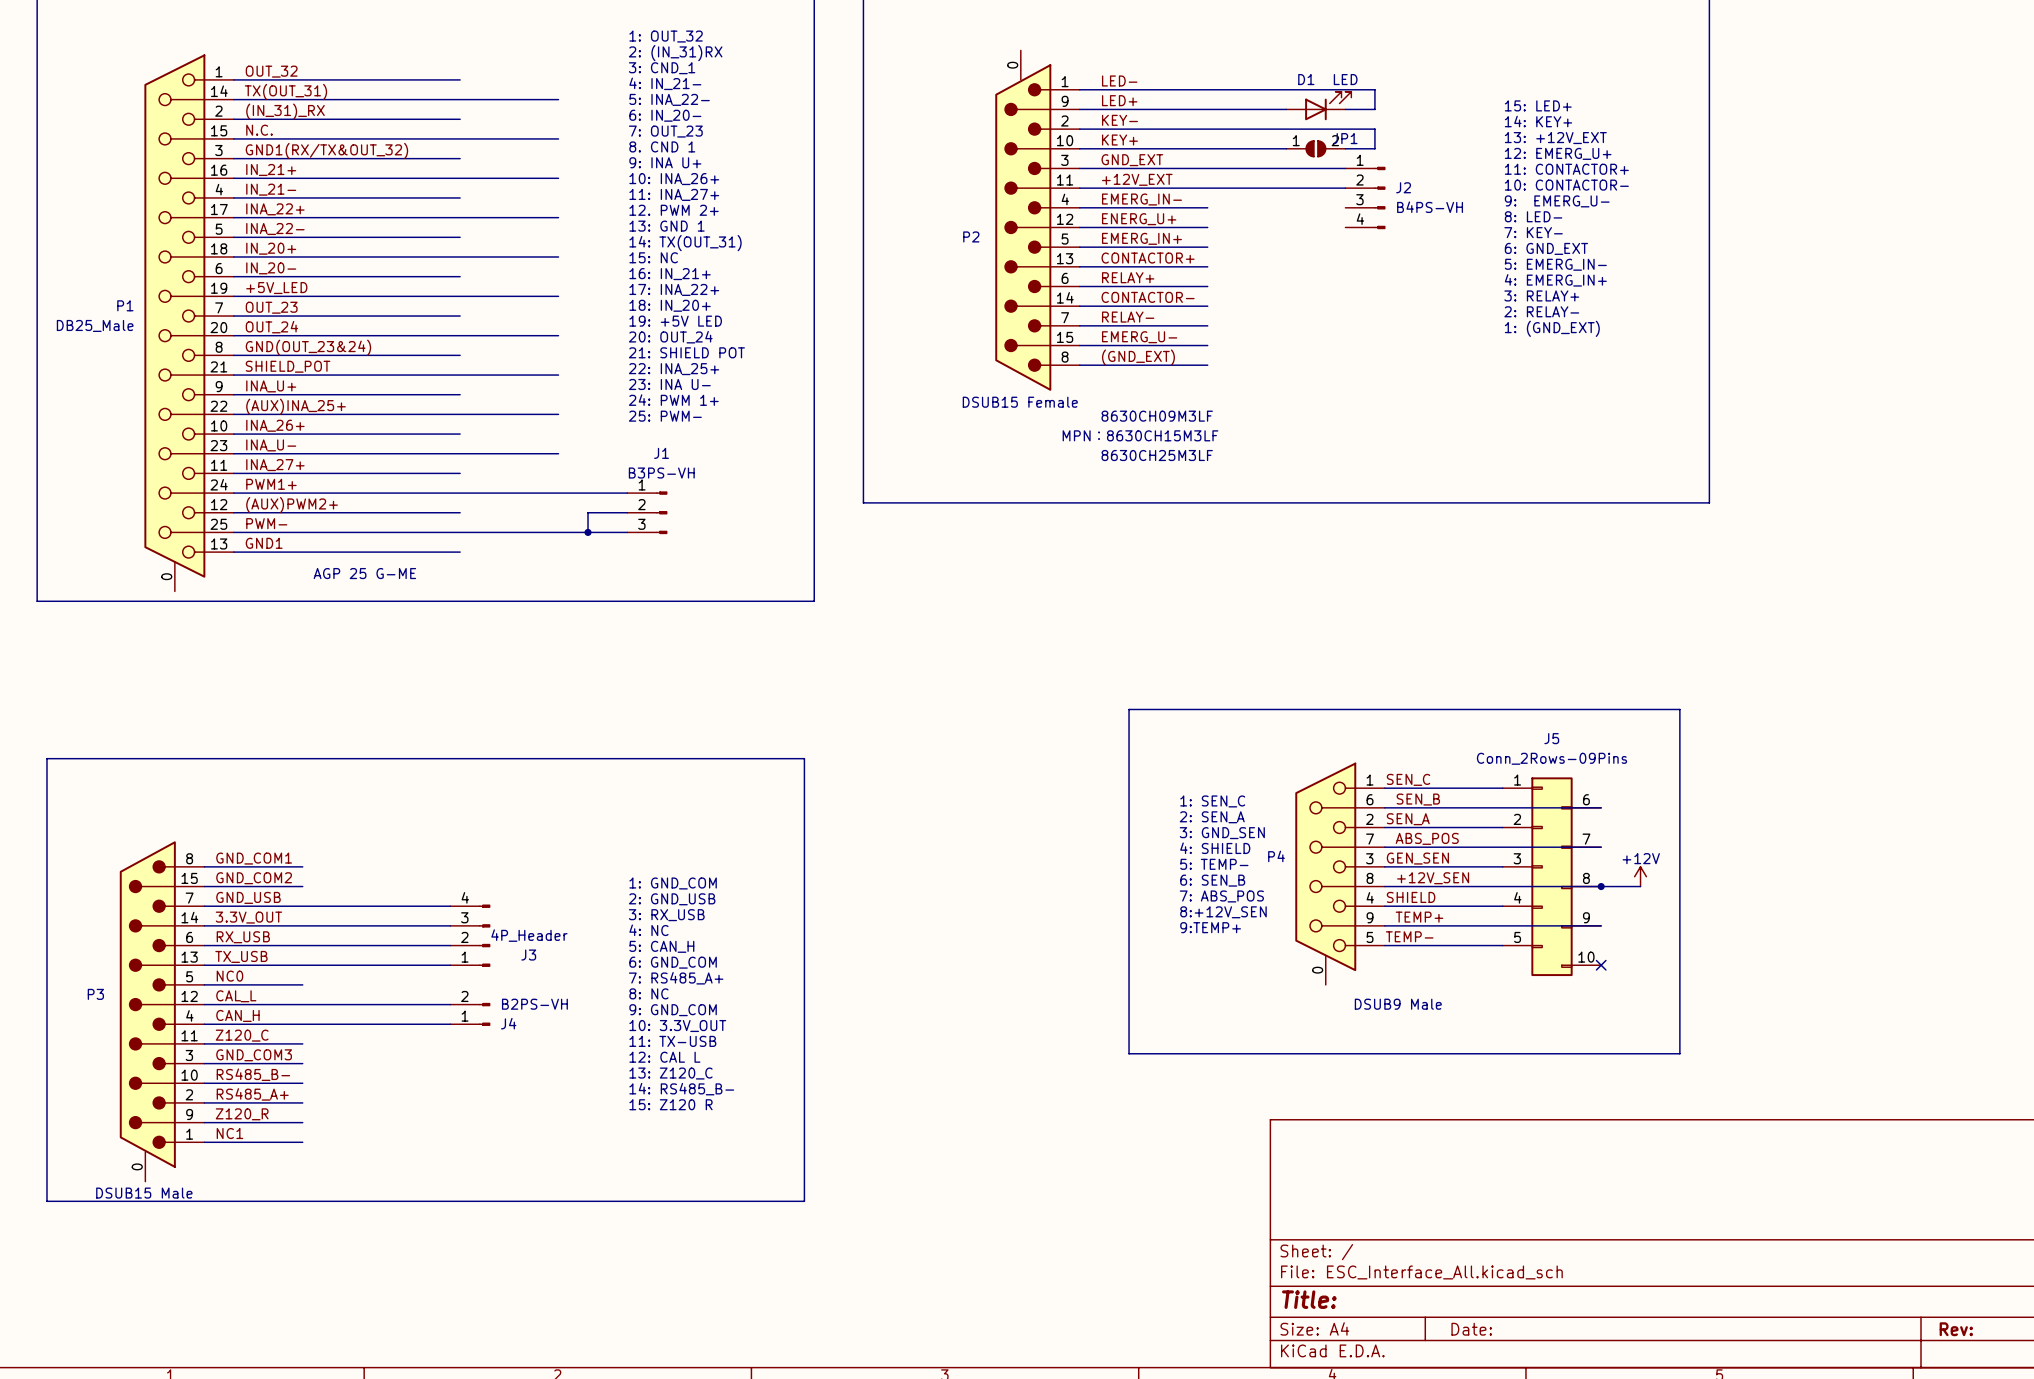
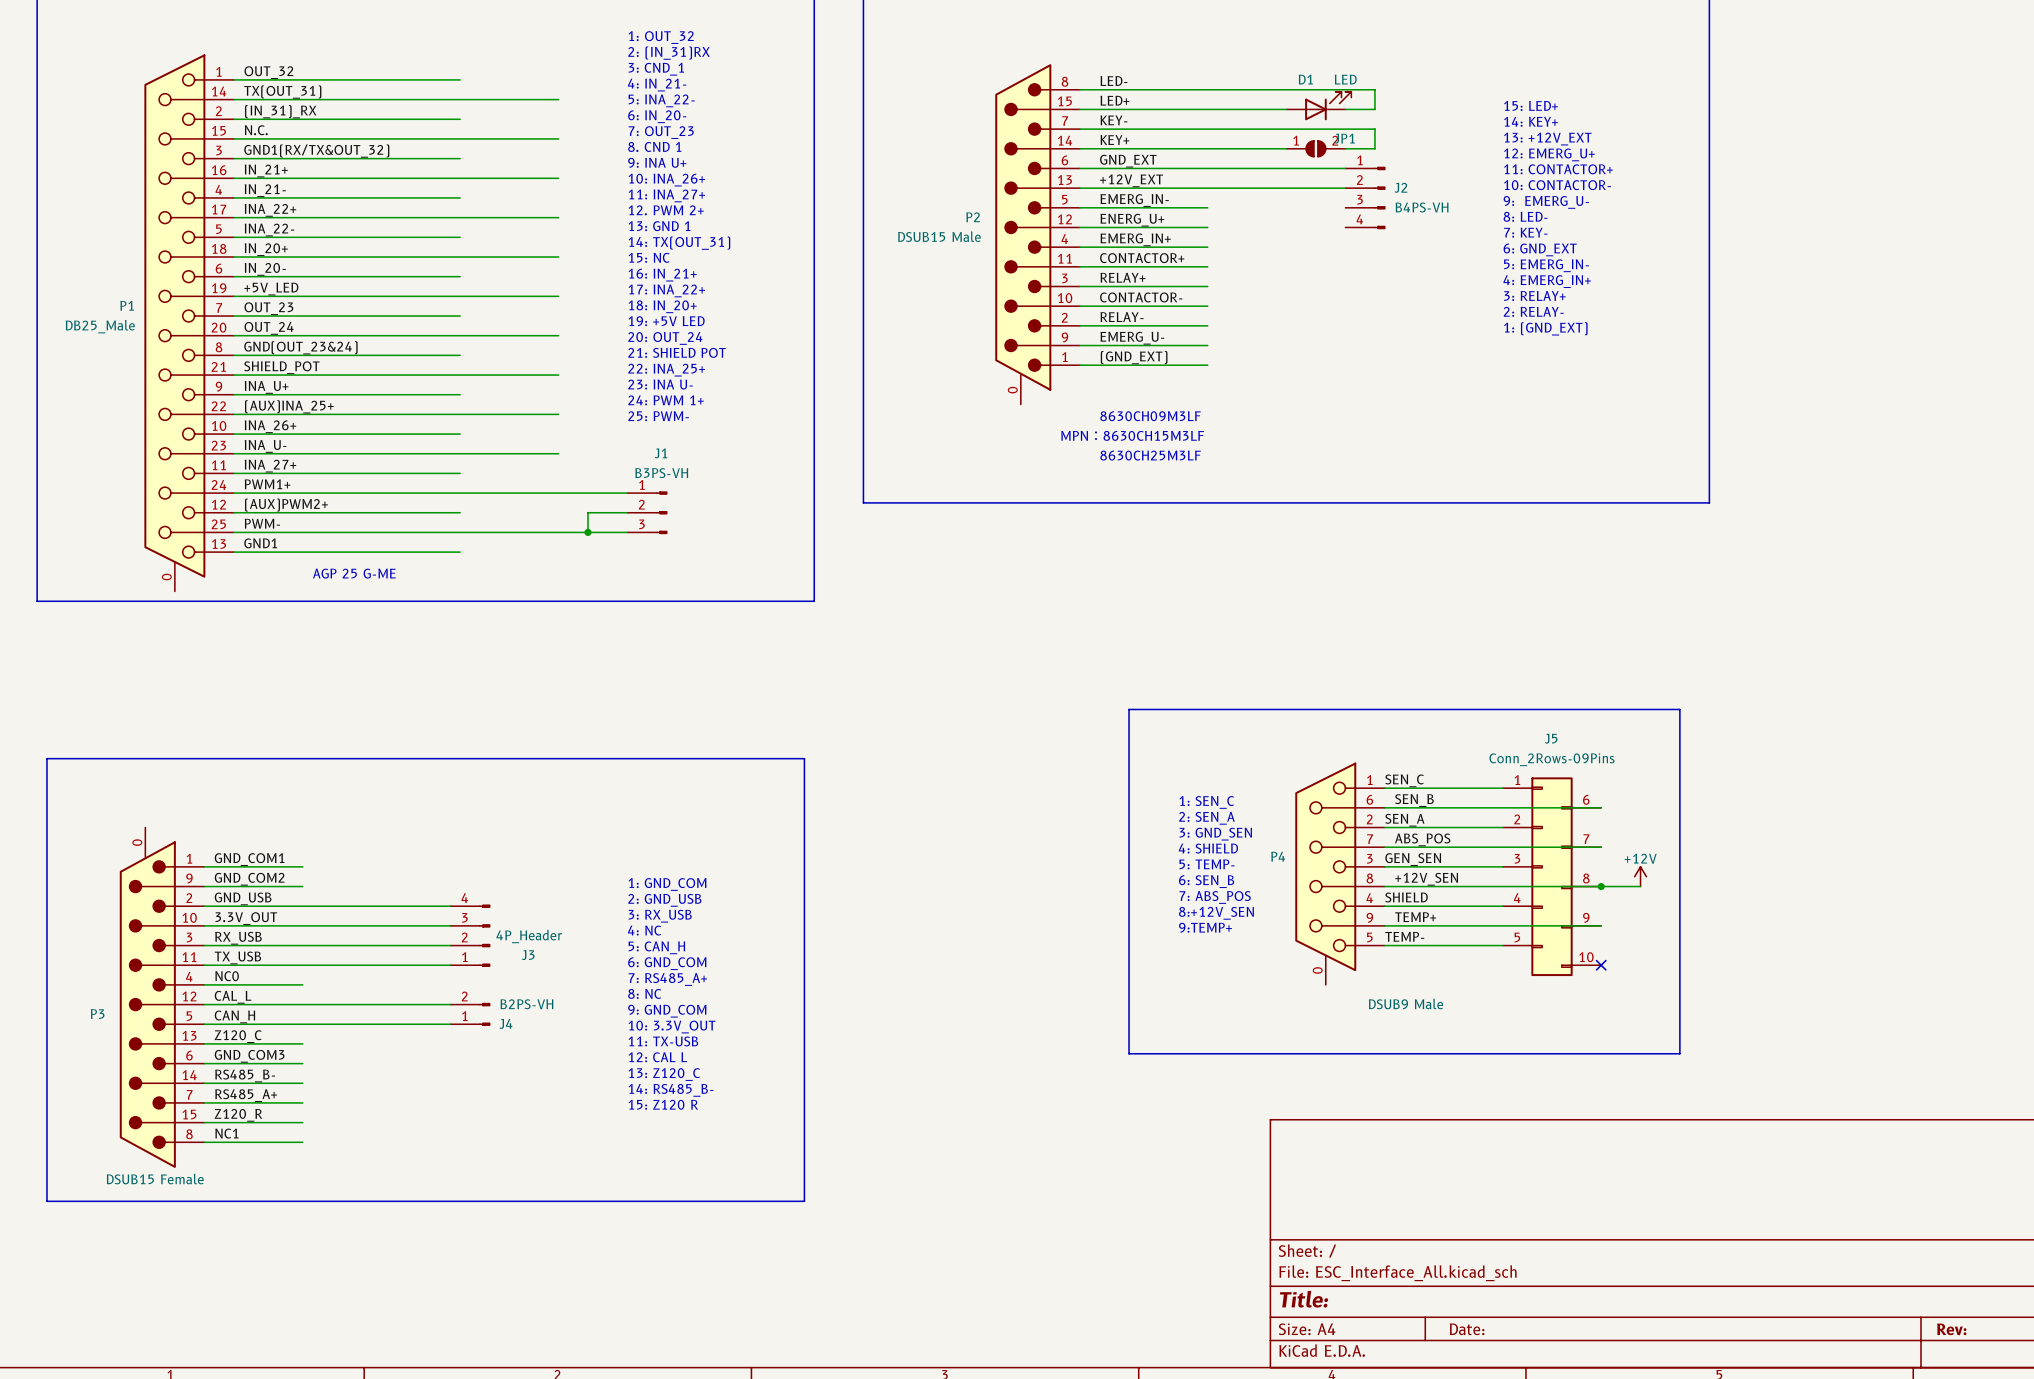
P2 flip: as is (1023, 227) -> up-down (1023, 227)
P2 value: DSUB15 Female (1020, 402) -> DSUB15 Male (939, 236)
P3 flip: as is (147, 1004) -> up-down (147, 1004)
P3 value: DSUB15 Male (144, 1193) -> DSUB15 Female (155, 1179)

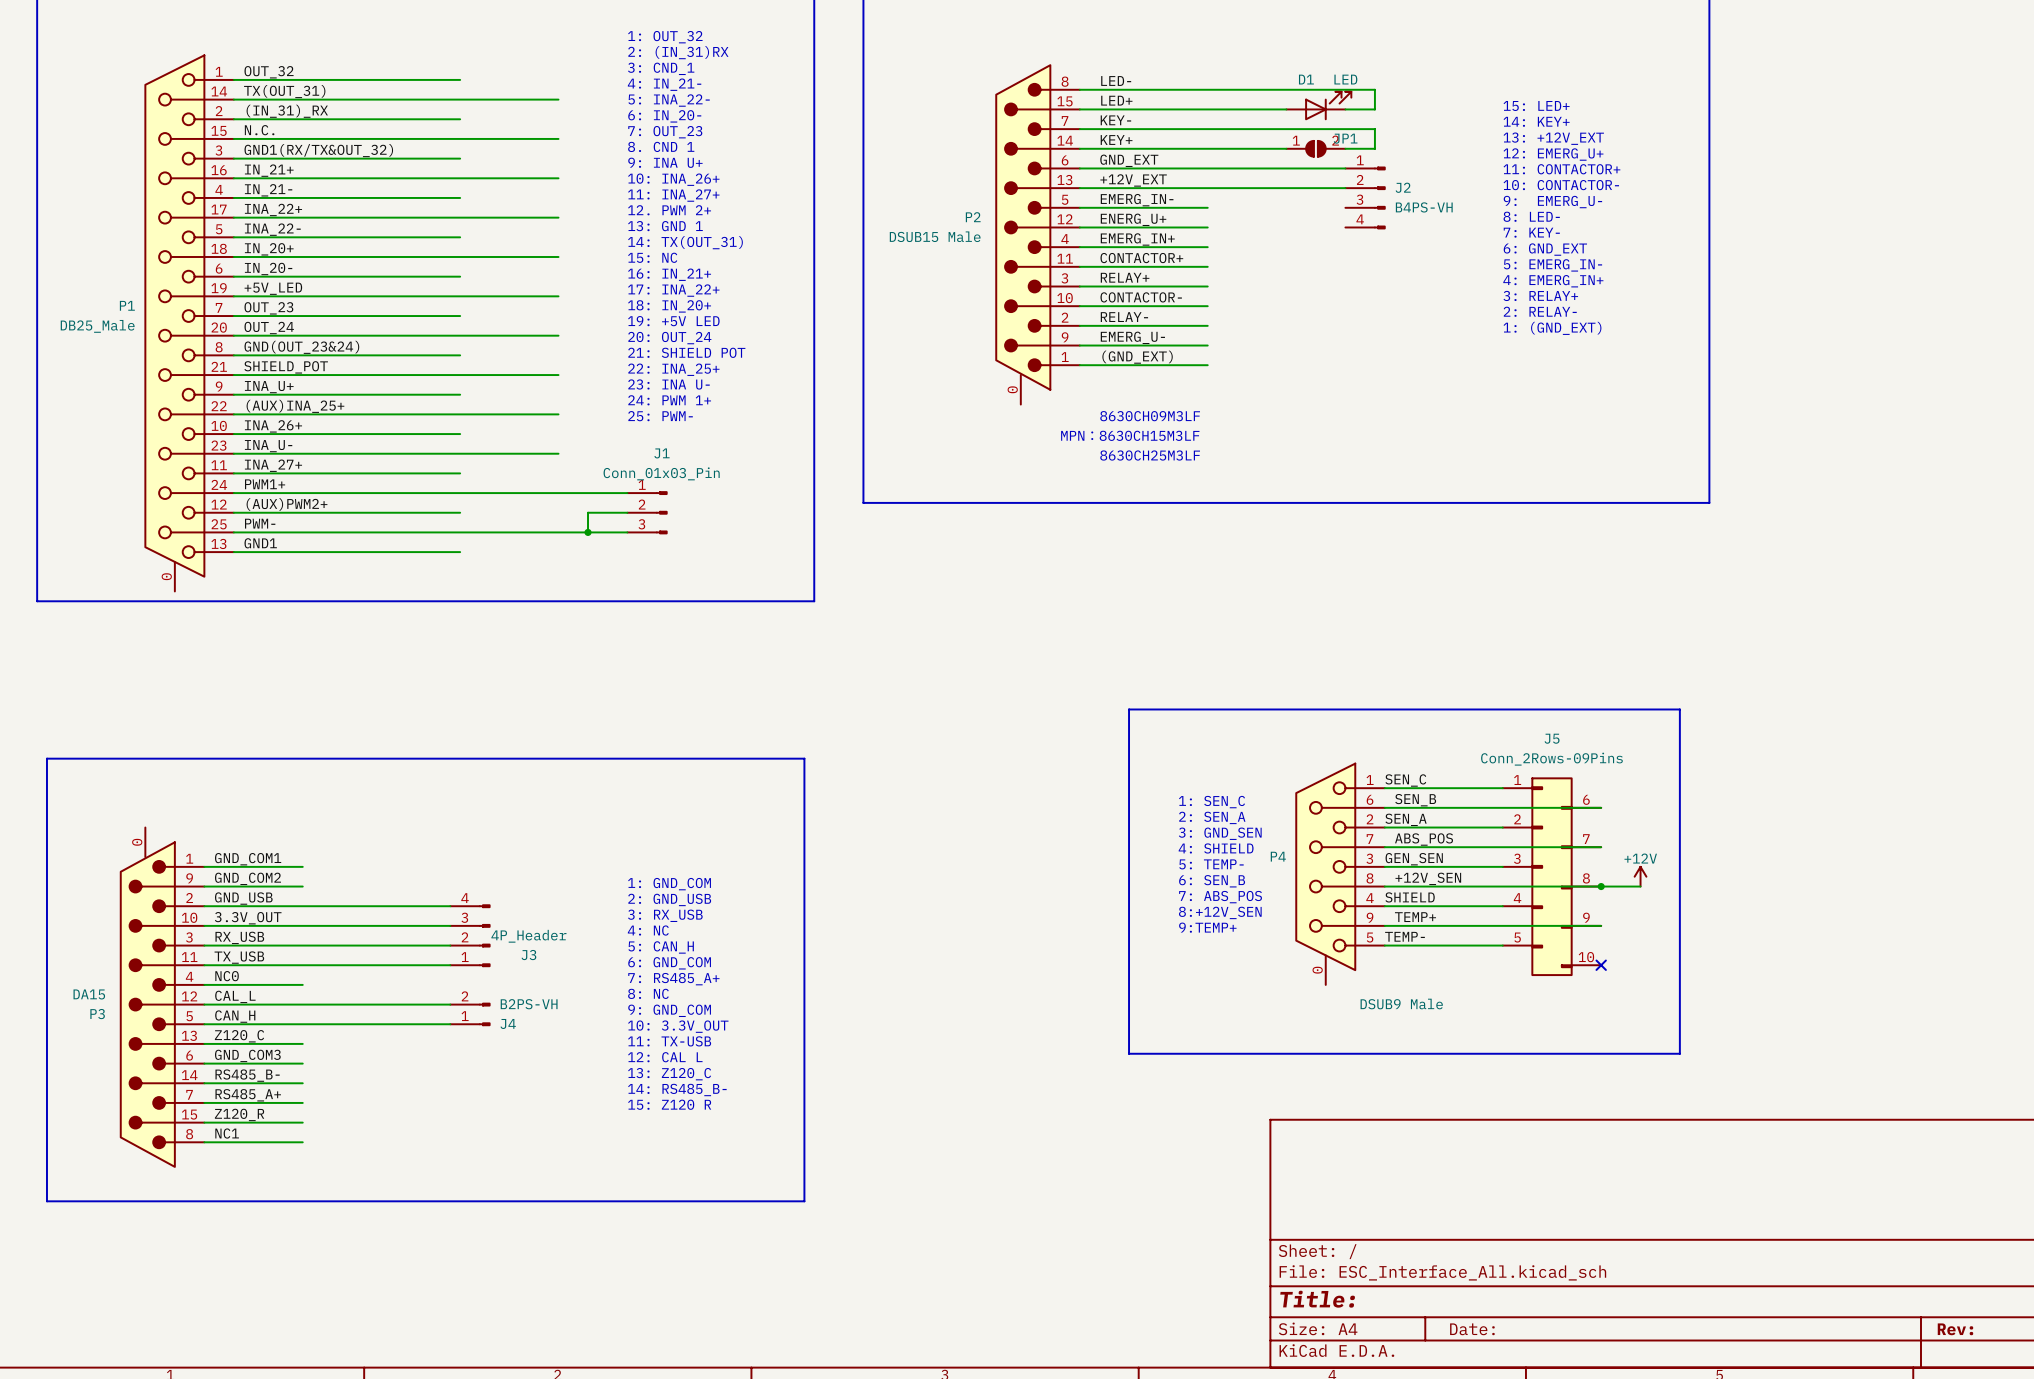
J1 value: B3PS-VH (661, 473) -> Conn_01x03_Pin (661, 473)
text: AGP 25 G-ME (354, 573) -> none
P3 value: DSUB15 Female (155, 1179) -> DA15 (89, 994)

